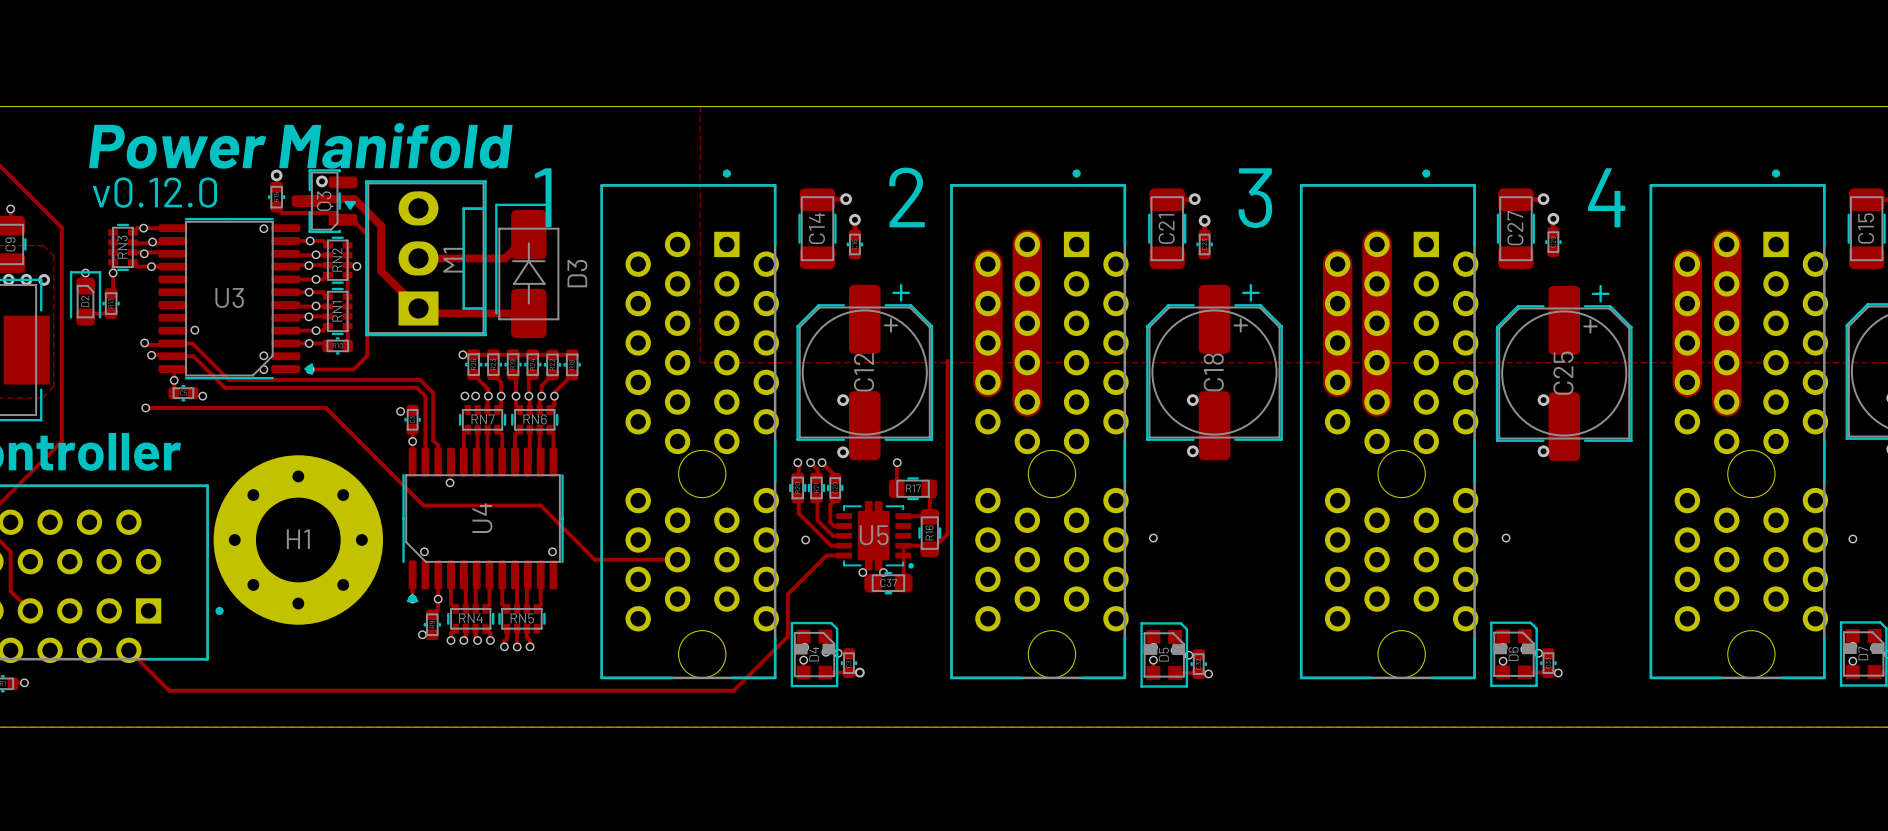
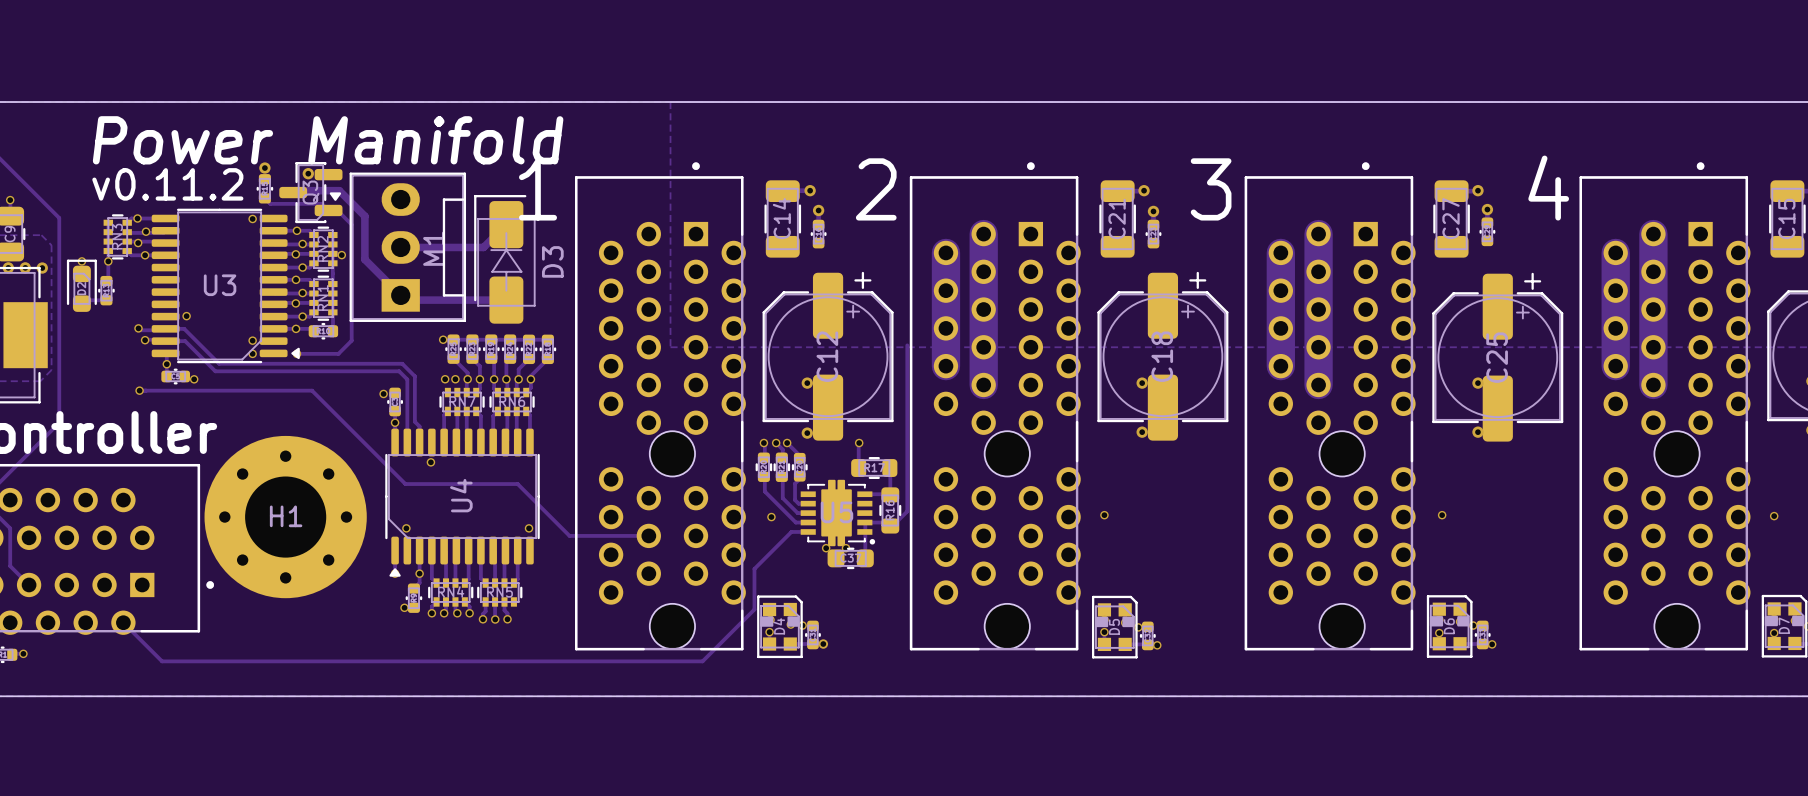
text: v0.12.0 (154, 192) -> v0.11.2 (167, 184)

